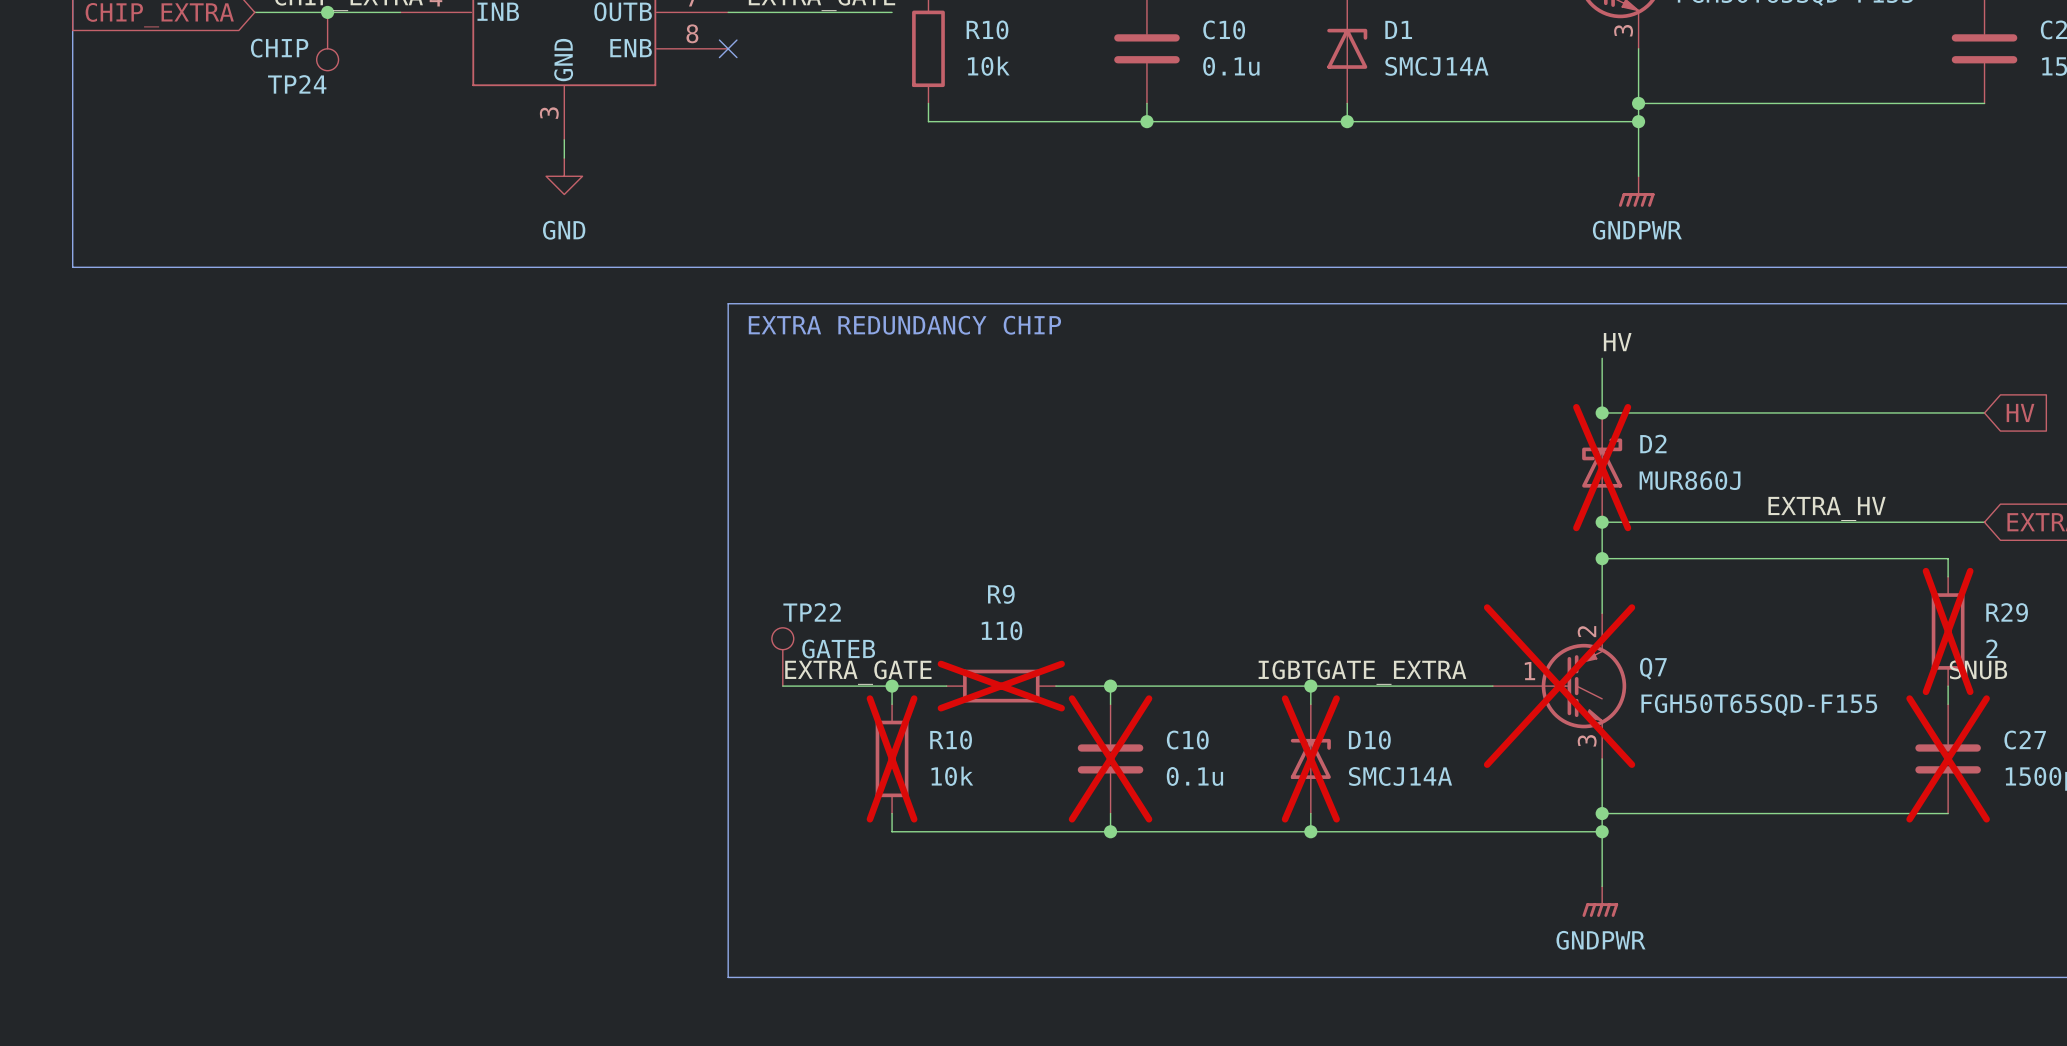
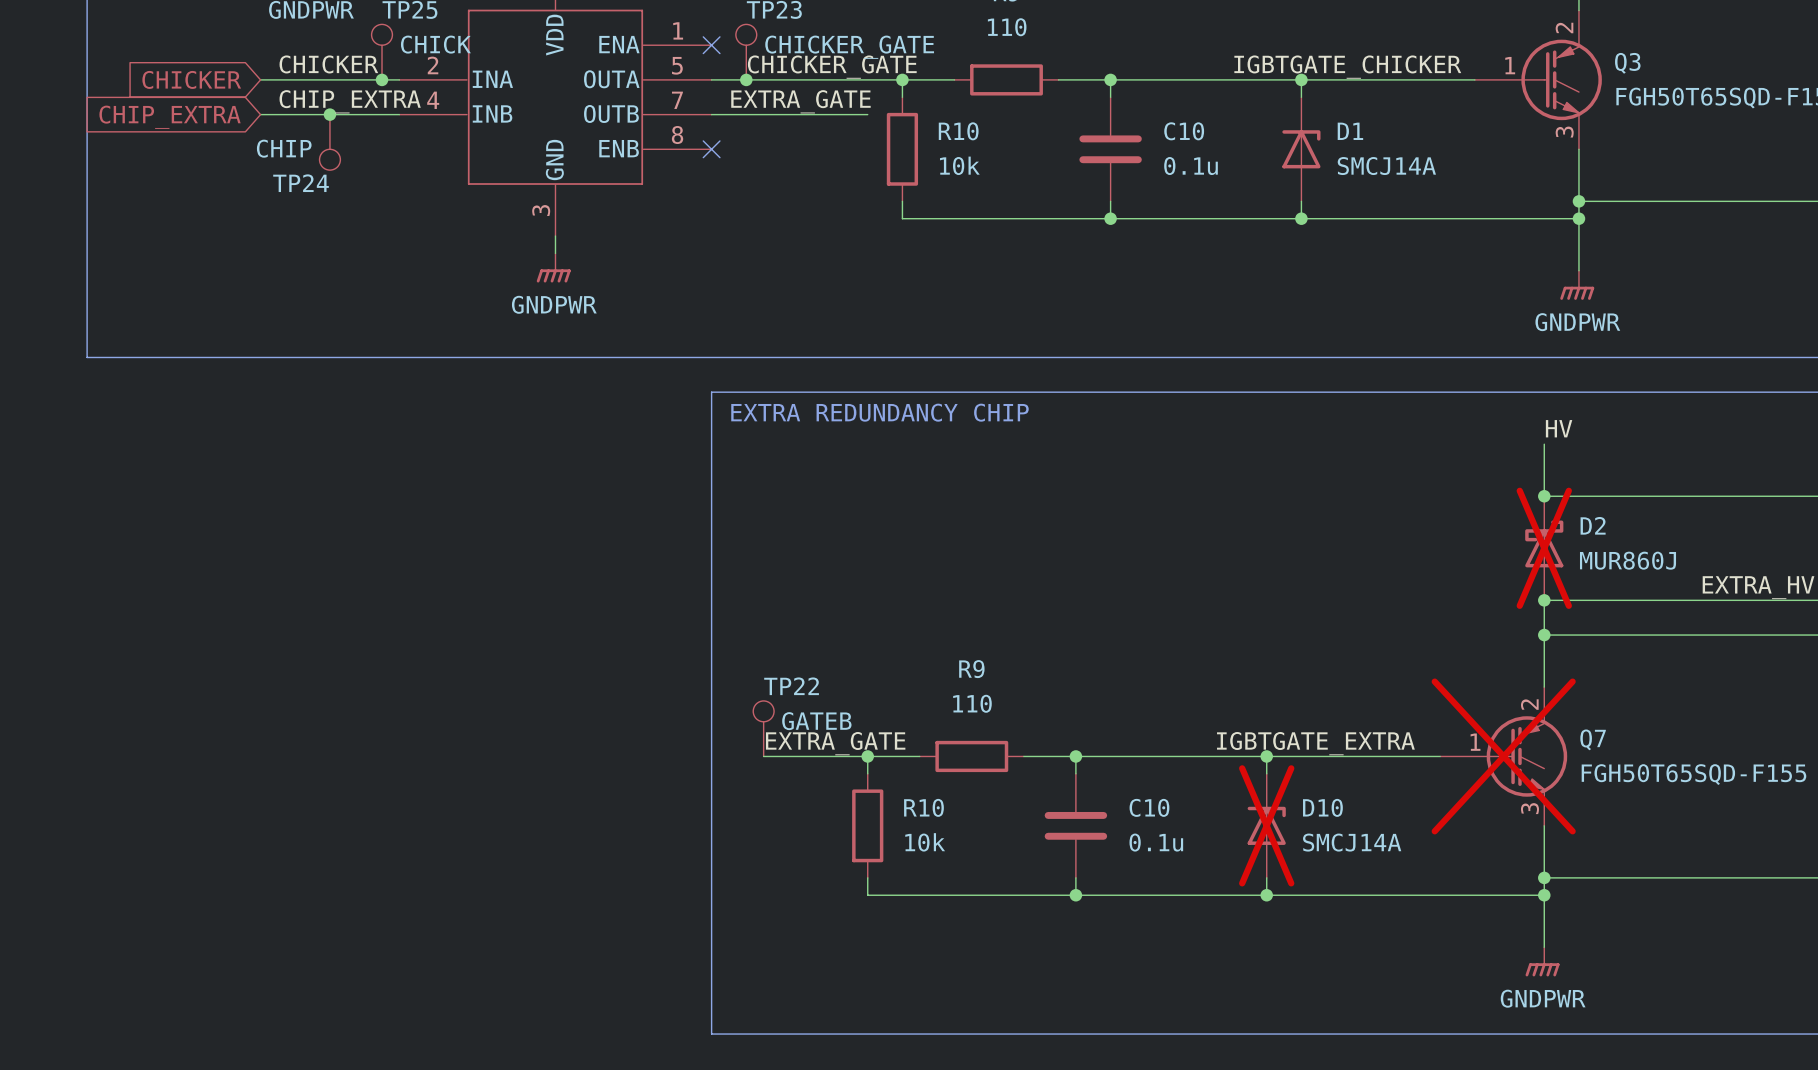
power symbol: GND (564, 176) -> GNDPWR (553, 267)
R9 do-not-place cross: (1001, 686) -> none
R10 do-not-place cross: (892, 758) -> none
C10 do-not-place cross: (1110, 758) -> none

